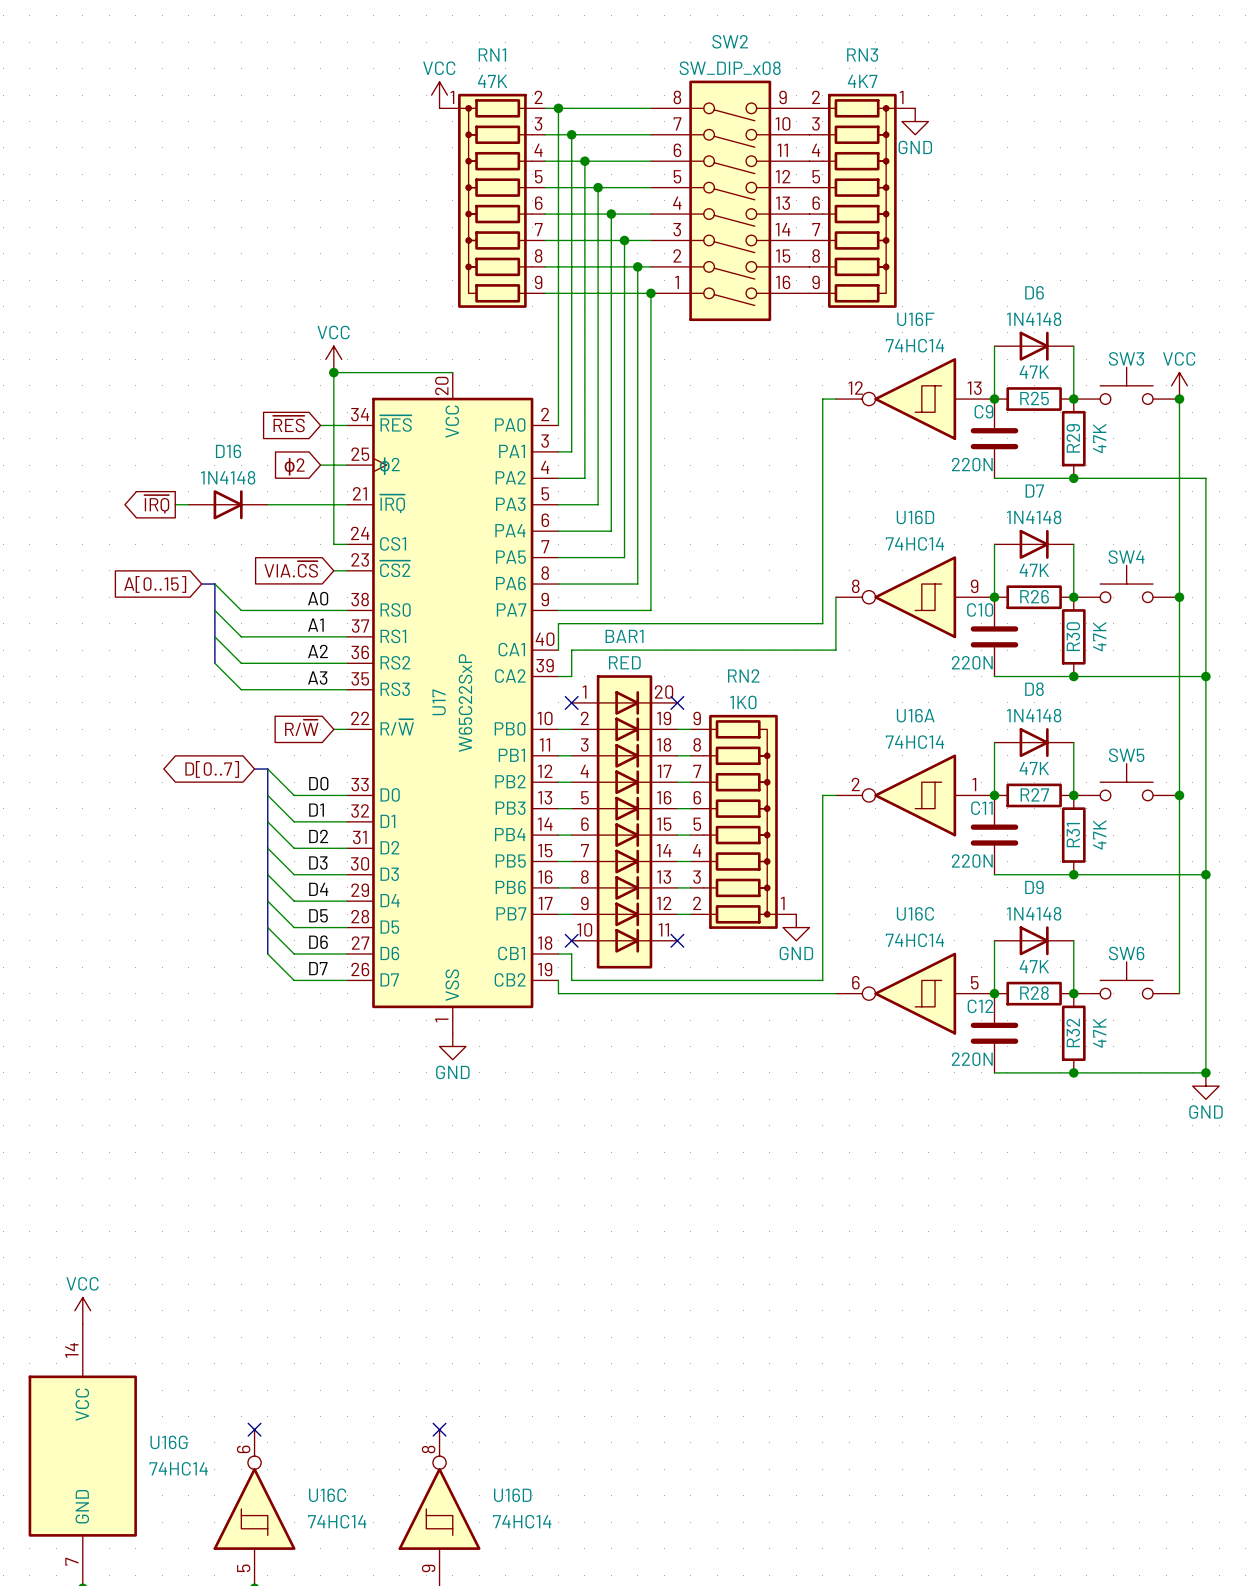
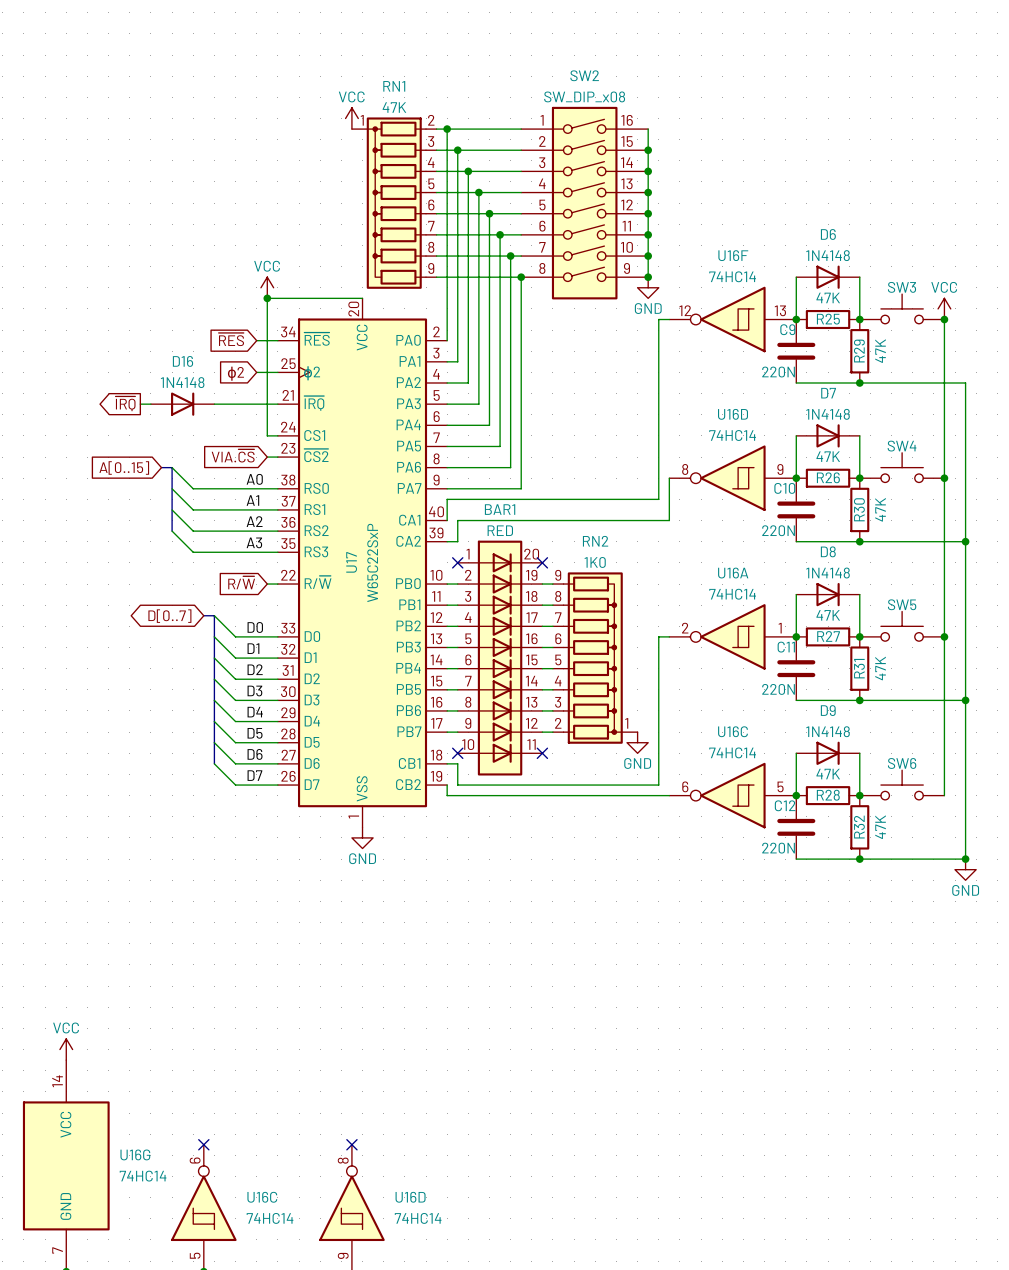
power symbol position: VCC (439, 95) -> VCC (351, 118)
wire: (545, 108) (650, 108) -> (436, 256) (521, 256)
wire: (558, 108) (558, 161) -> none
junction: (558, 108) -> none
power symbol: GND (915, 121) -> none
wire: (545, 134) (650, 134) -> none
wire: (571, 134) (571, 187) -> none
junction: (571, 134) -> none
junction: none -> (447, 129)
wire: (584, 161) (584, 214) -> none
junction: (584, 161) -> none
wire: none -> (648, 129) (648, 277)
junction: none -> (457, 150)
wire: (598, 187) (598, 240) -> none
junction: (598, 187) -> none
junction: none -> (648, 150)
RN1 position: (492, 200) -> (394, 203)
SW2 flip: as is (730, 200) -> up-down (584, 203)
RN3: 4K7 (862, 200) -> none
junction: none -> (468, 171)
wire: (611, 214) (611, 266) -> none
junction: (611, 214) -> none
junction: none -> (648, 171)
junction: none -> (478, 192)
wire: (624, 240) (624, 293) -> none
junction: (624, 240) -> none
junction: none -> (648, 192)
junction: none -> (489, 213)
wire: (637, 266) (637, 319) -> none
junction: (637, 266) -> none
junction: none -> (648, 213)
junction: none -> (500, 234)
wire: (650, 293) (650, 346) -> (436, 277) (521, 277)
junction: (650, 293) -> none
junction: none -> (648, 234)
junction: none -> (510, 256)
junction: none -> (648, 256)
junction: none -> (521, 277)
junction: none -> (648, 277)
power symbol: none -> GND (648, 287)

